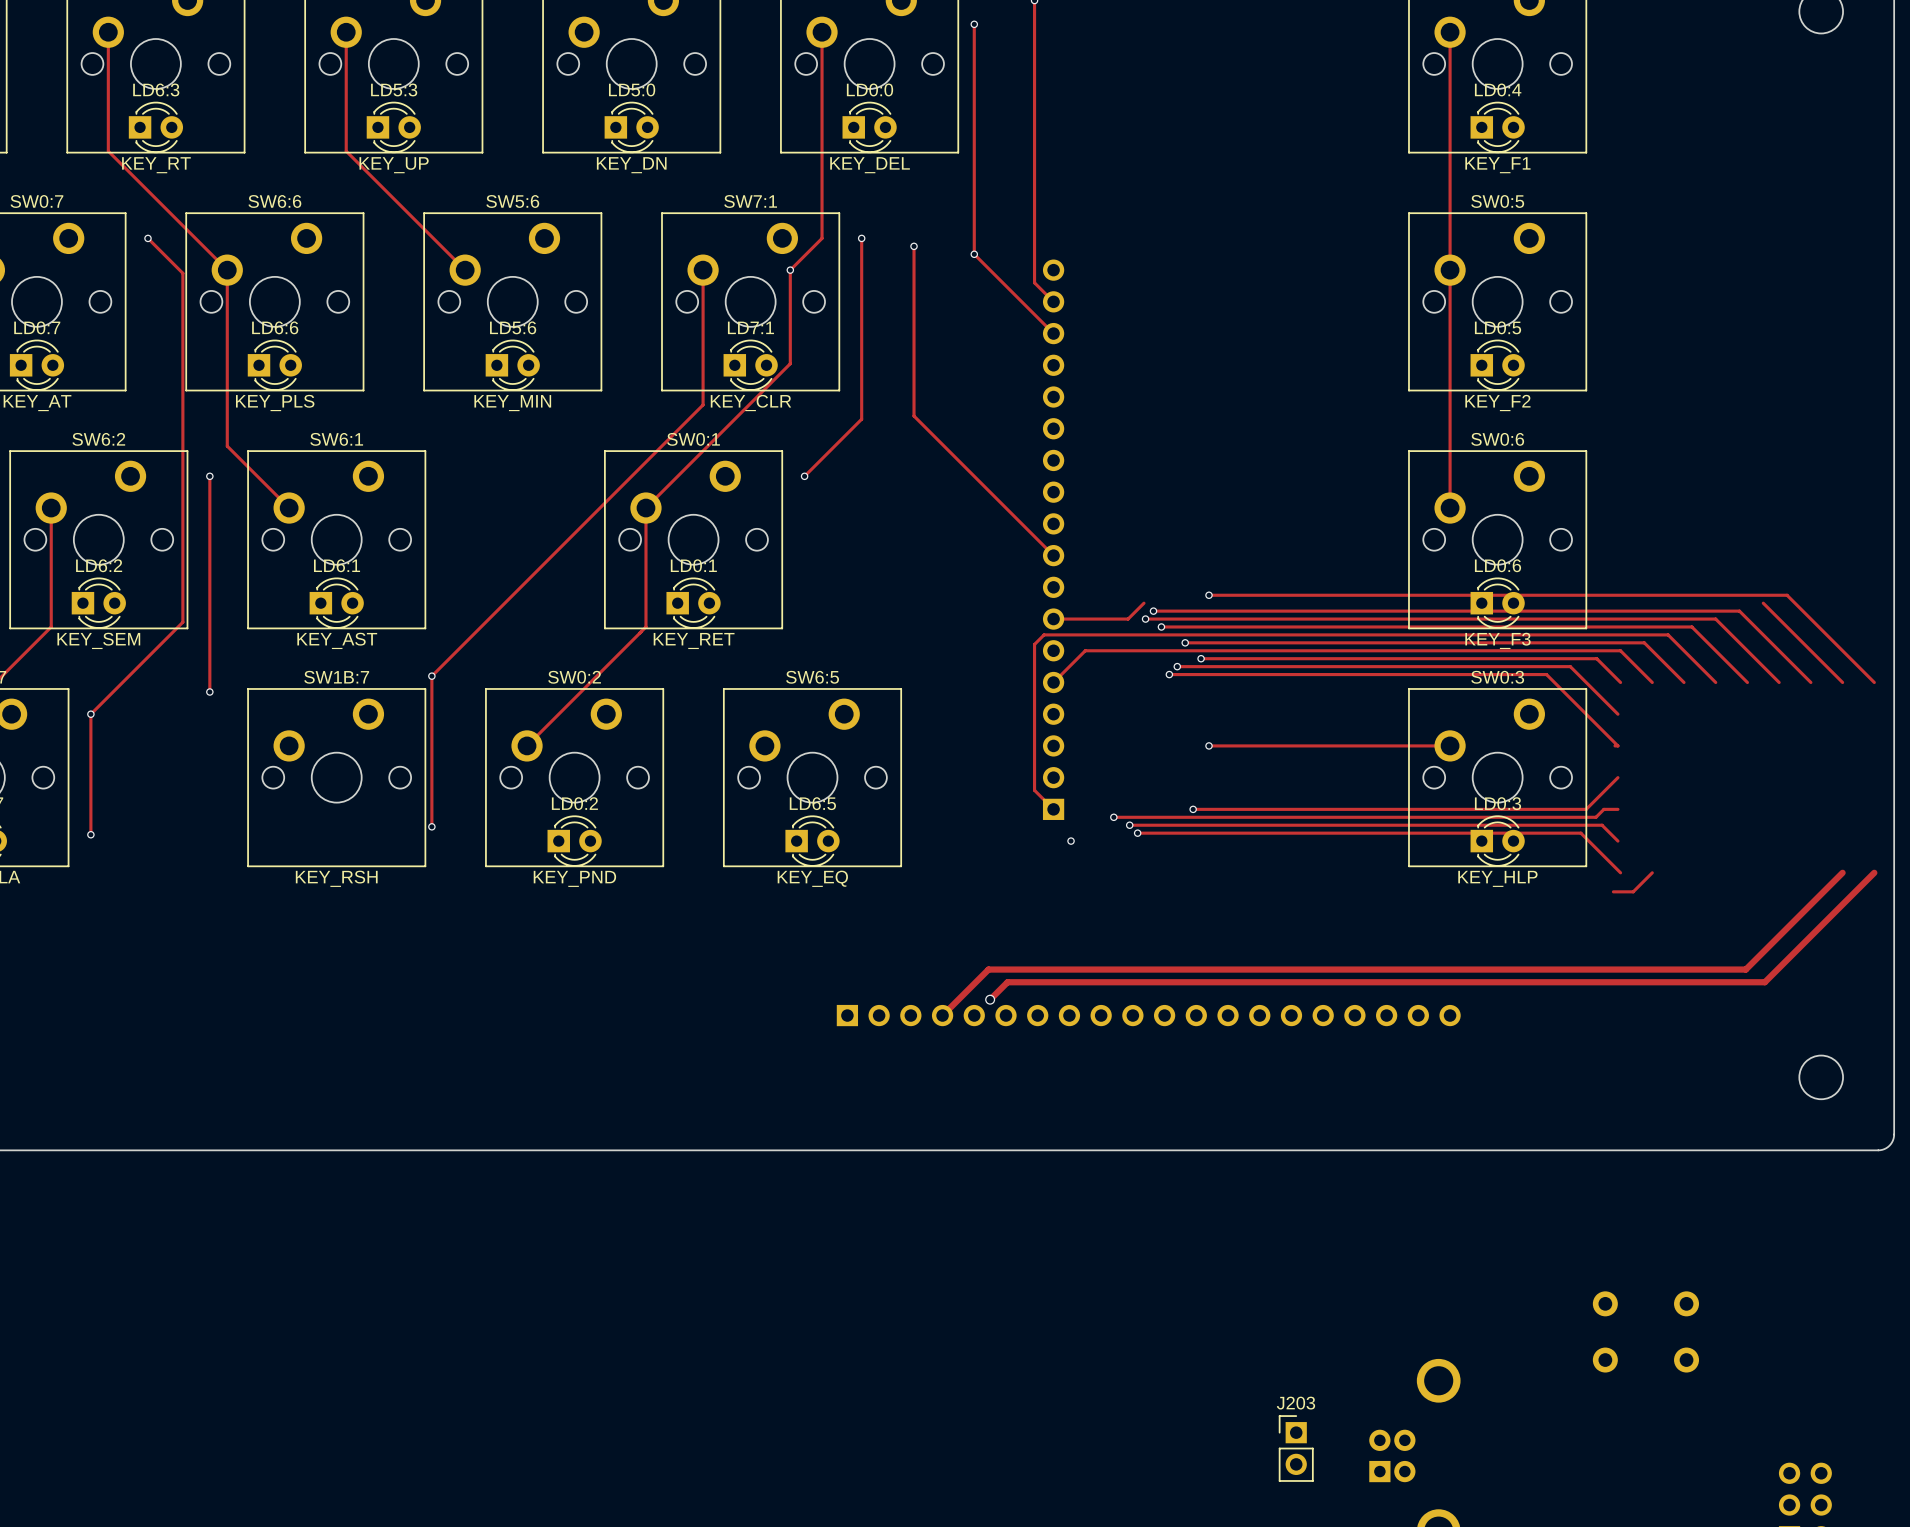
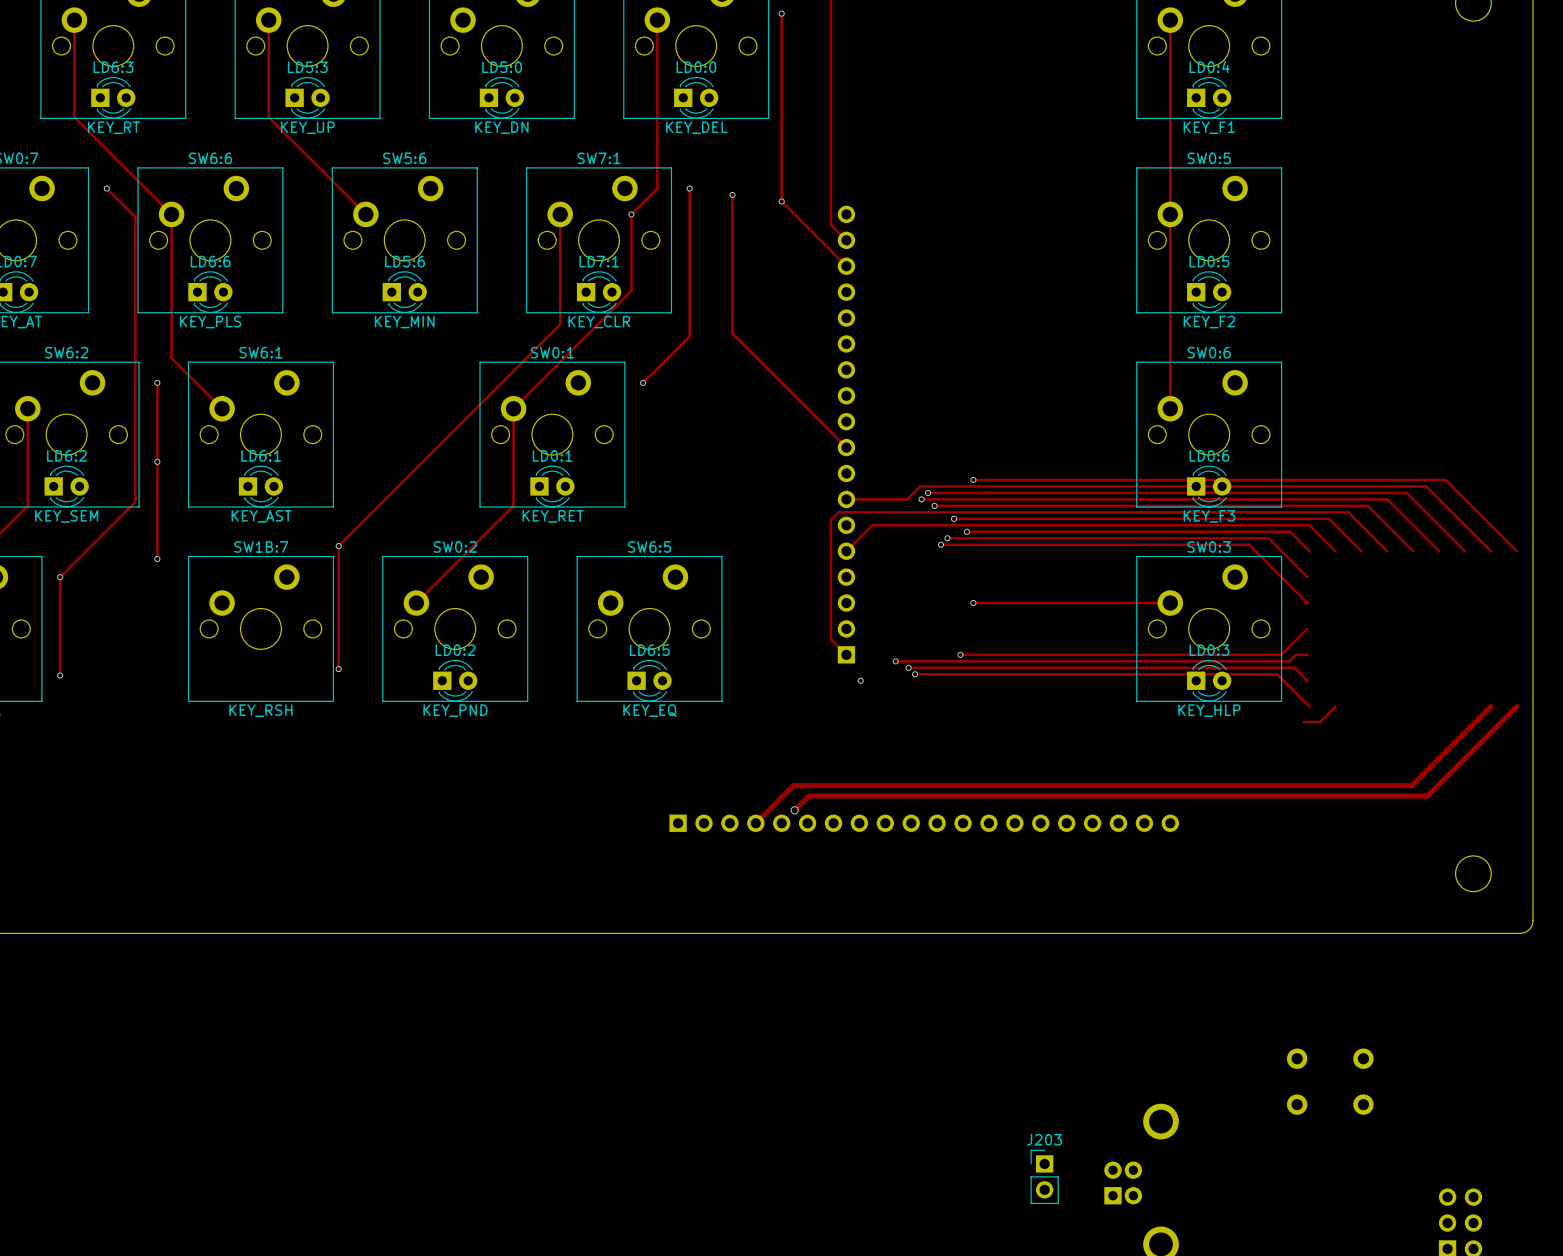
via: none -> (157, 461)
track: none -> (920, 486) (1426, 486)

